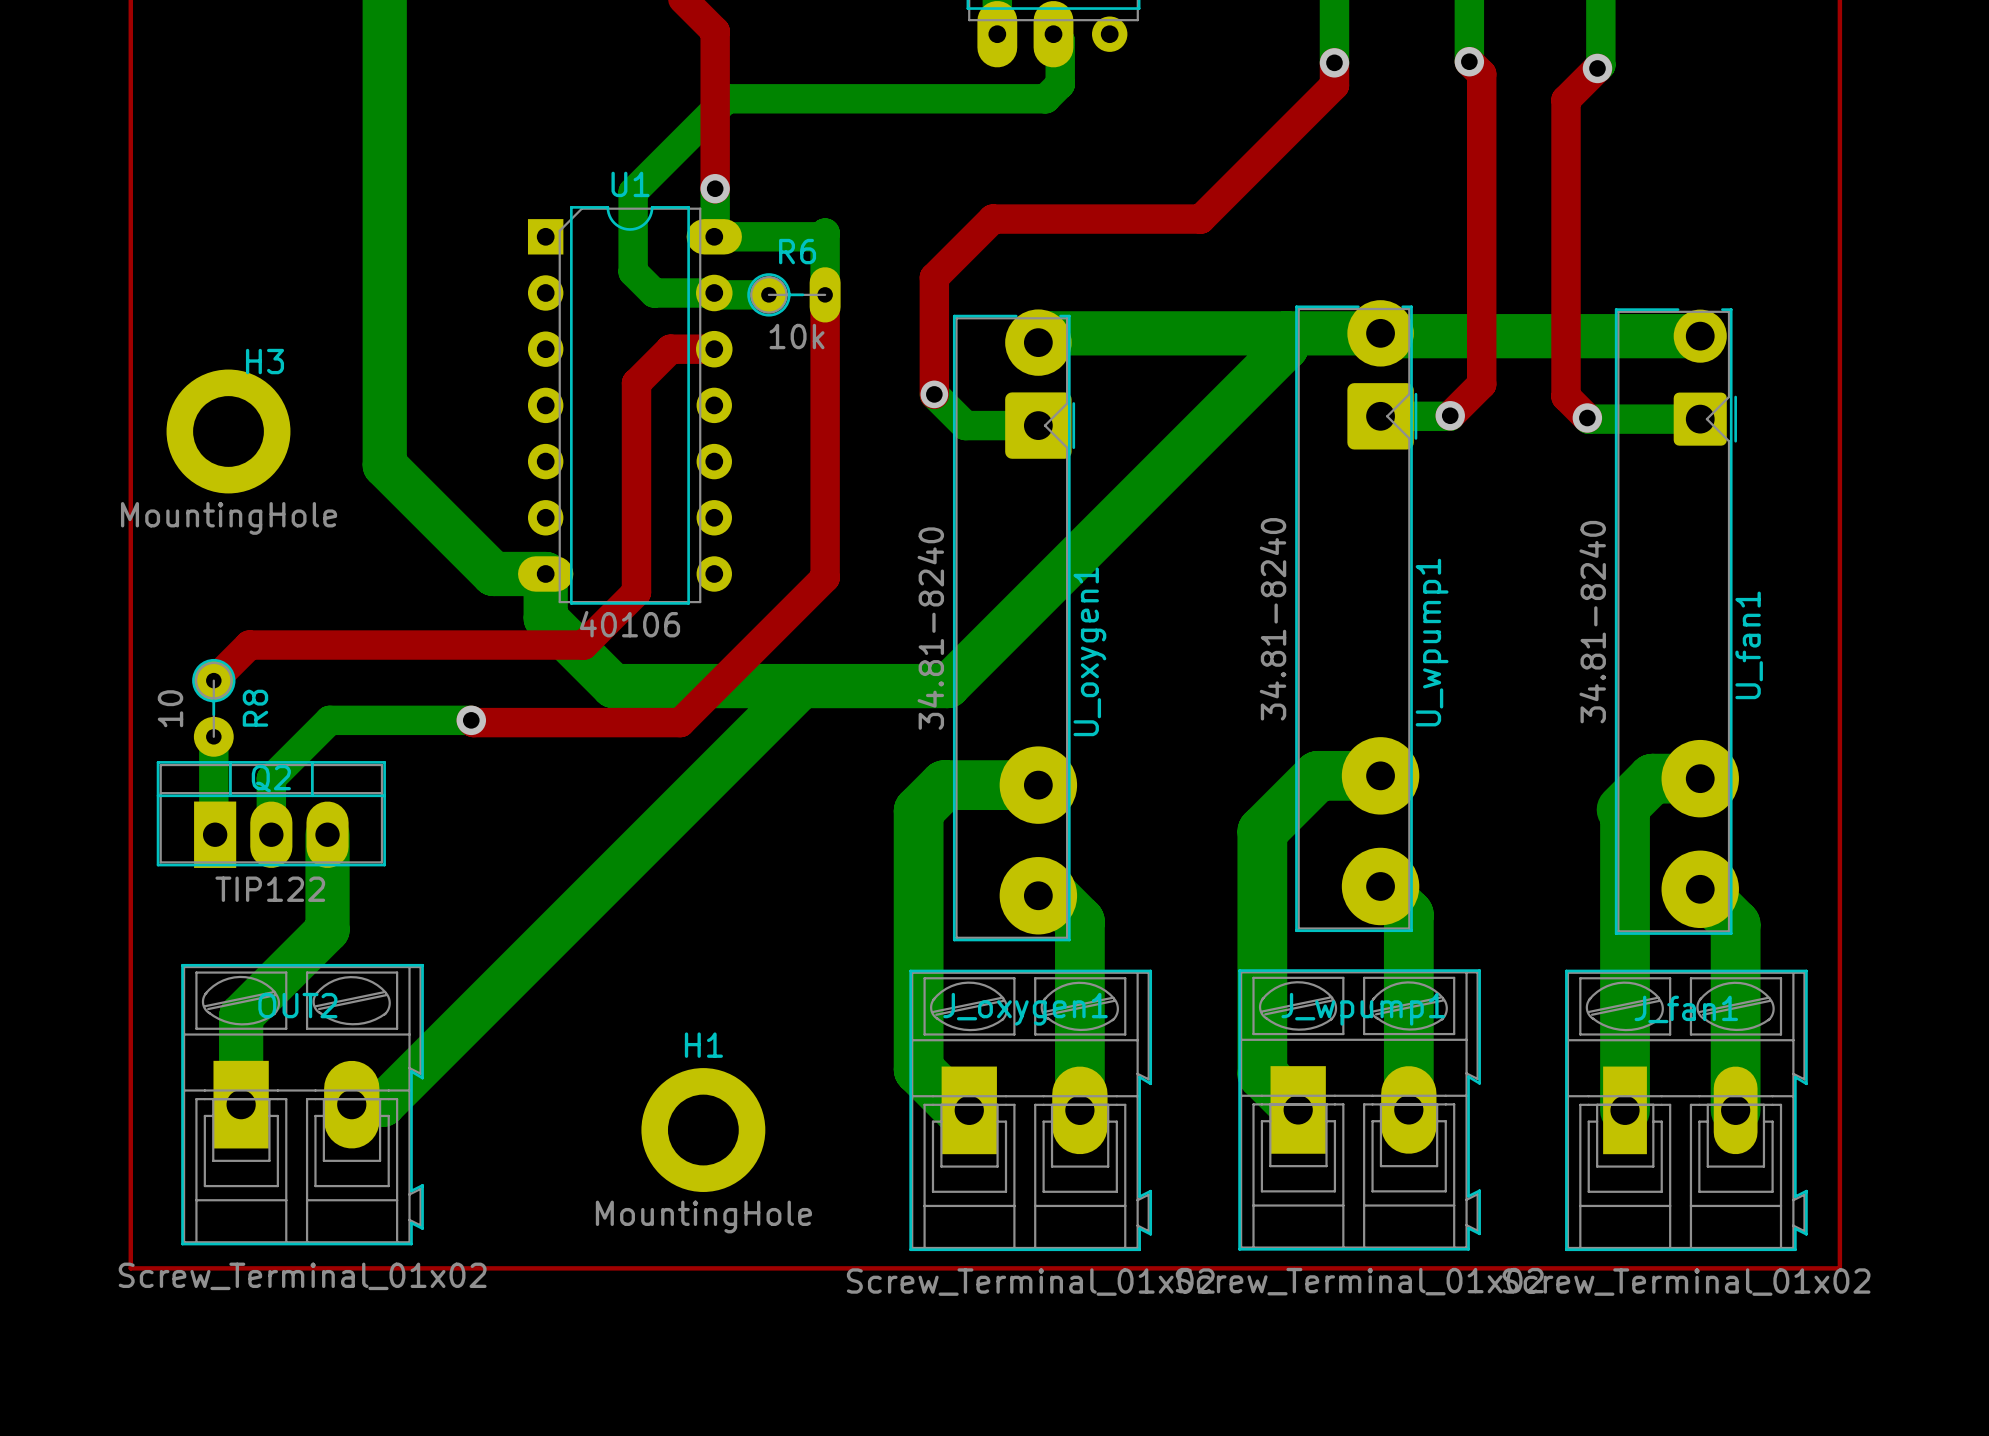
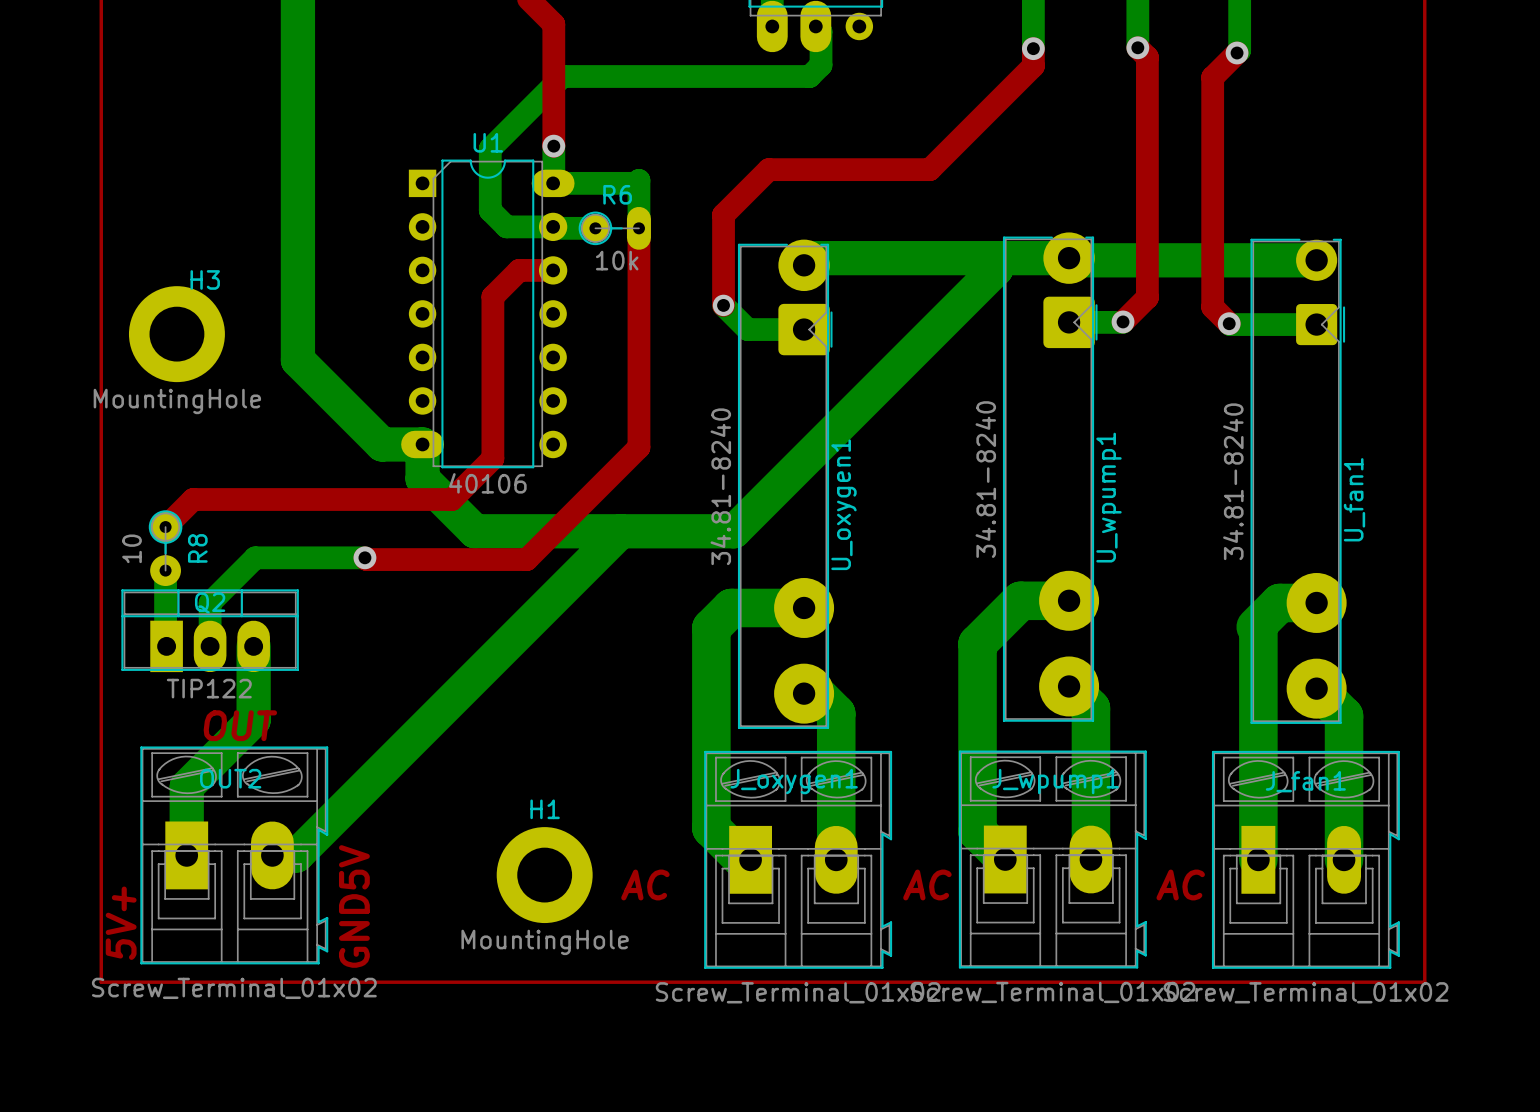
text: none -> OUT (240, 725)
text: none -> AC (645, 884)
text: none -> AC (927, 884)
text: none -> AC (1180, 884)
text: none -> GND5V (354, 906)
text: none -> 5V+ (121, 923)

